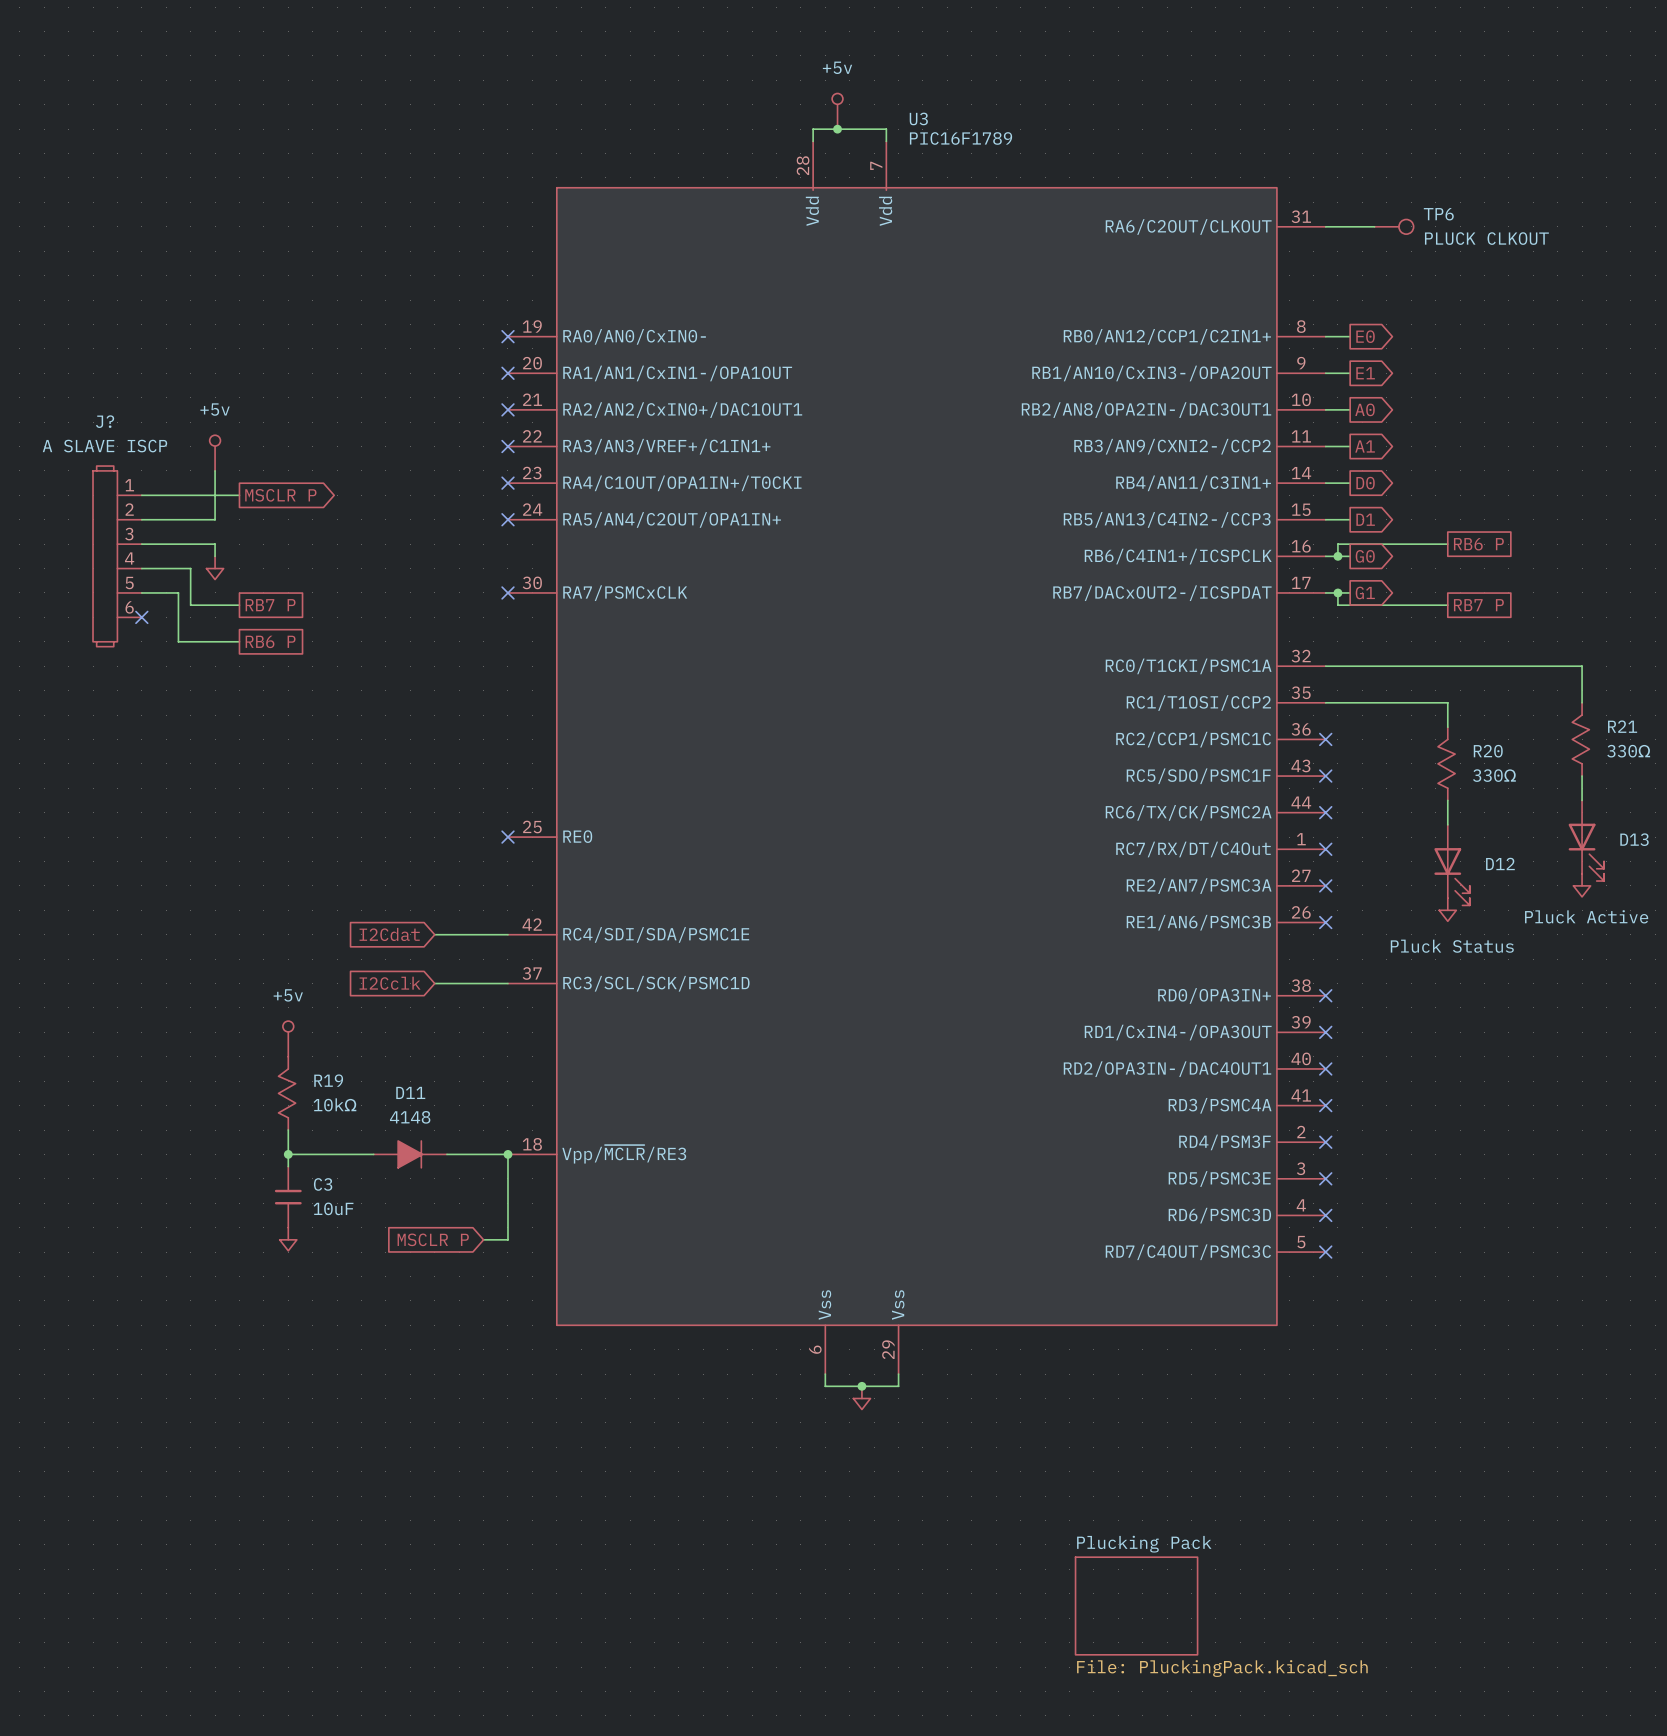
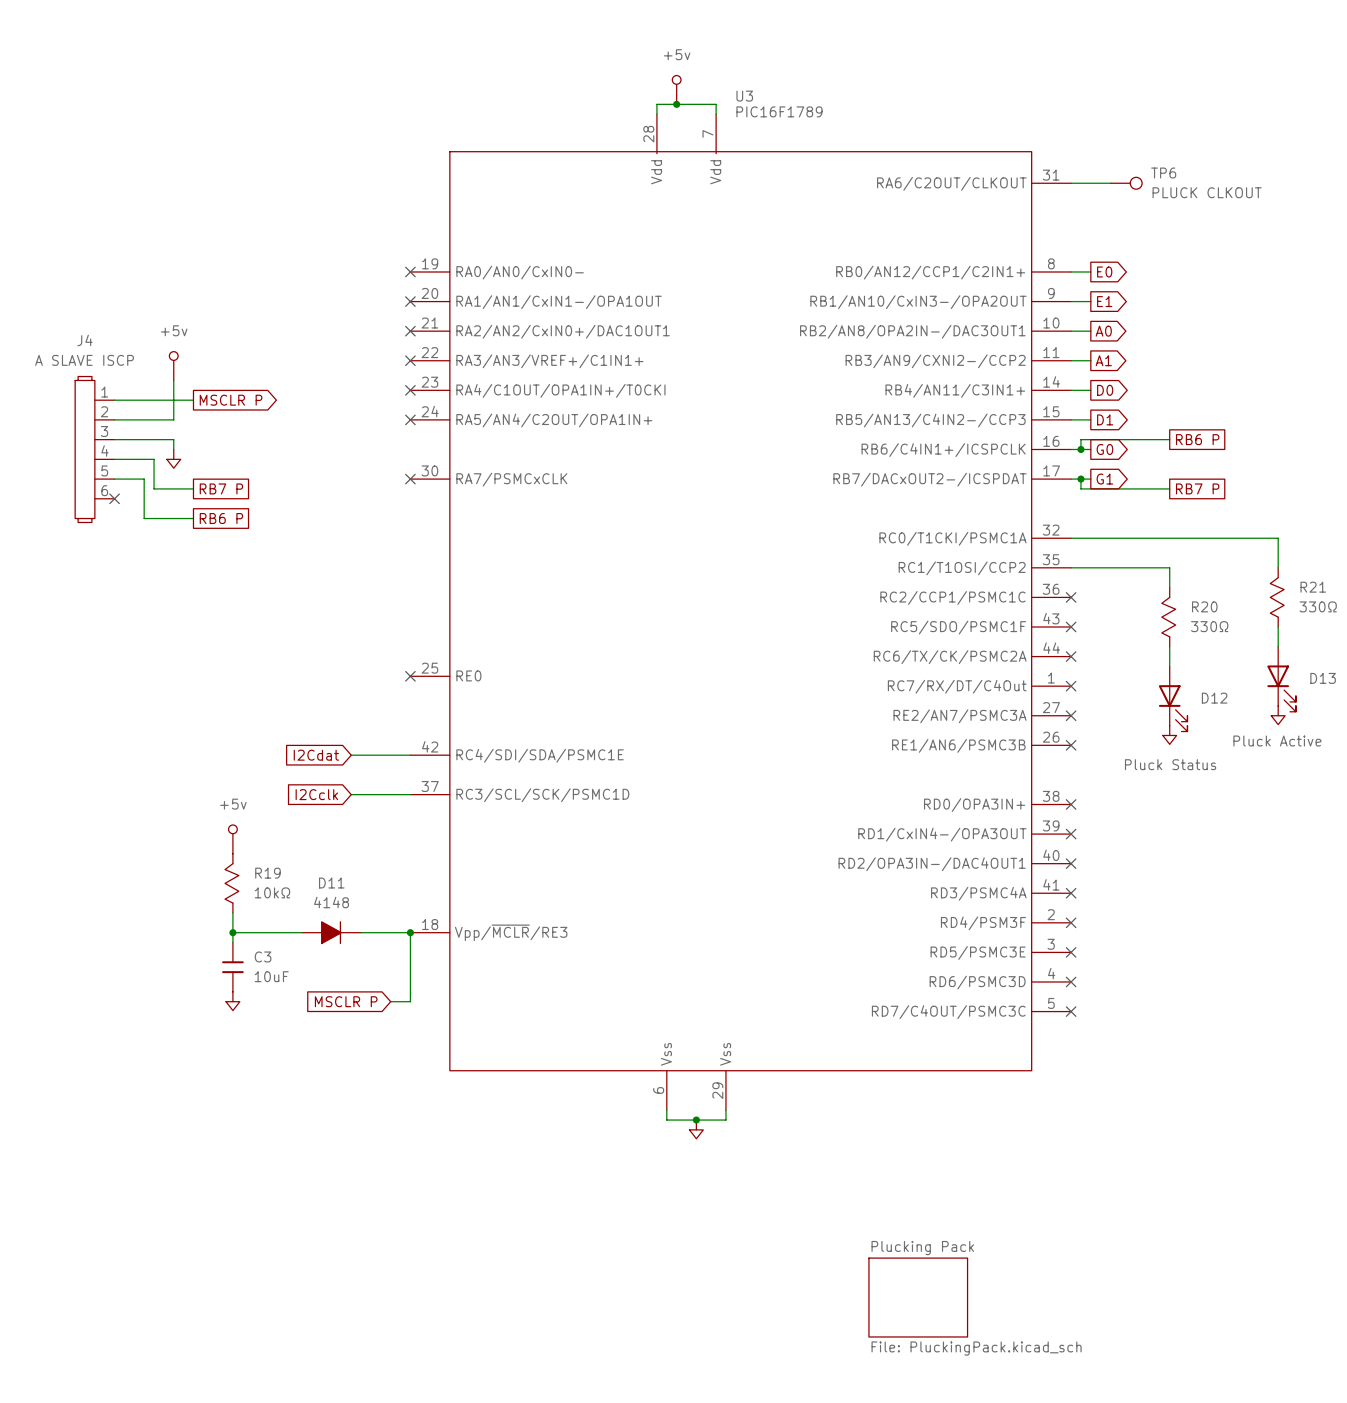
J? name: J? (105, 421) -> J4 (85, 340)

